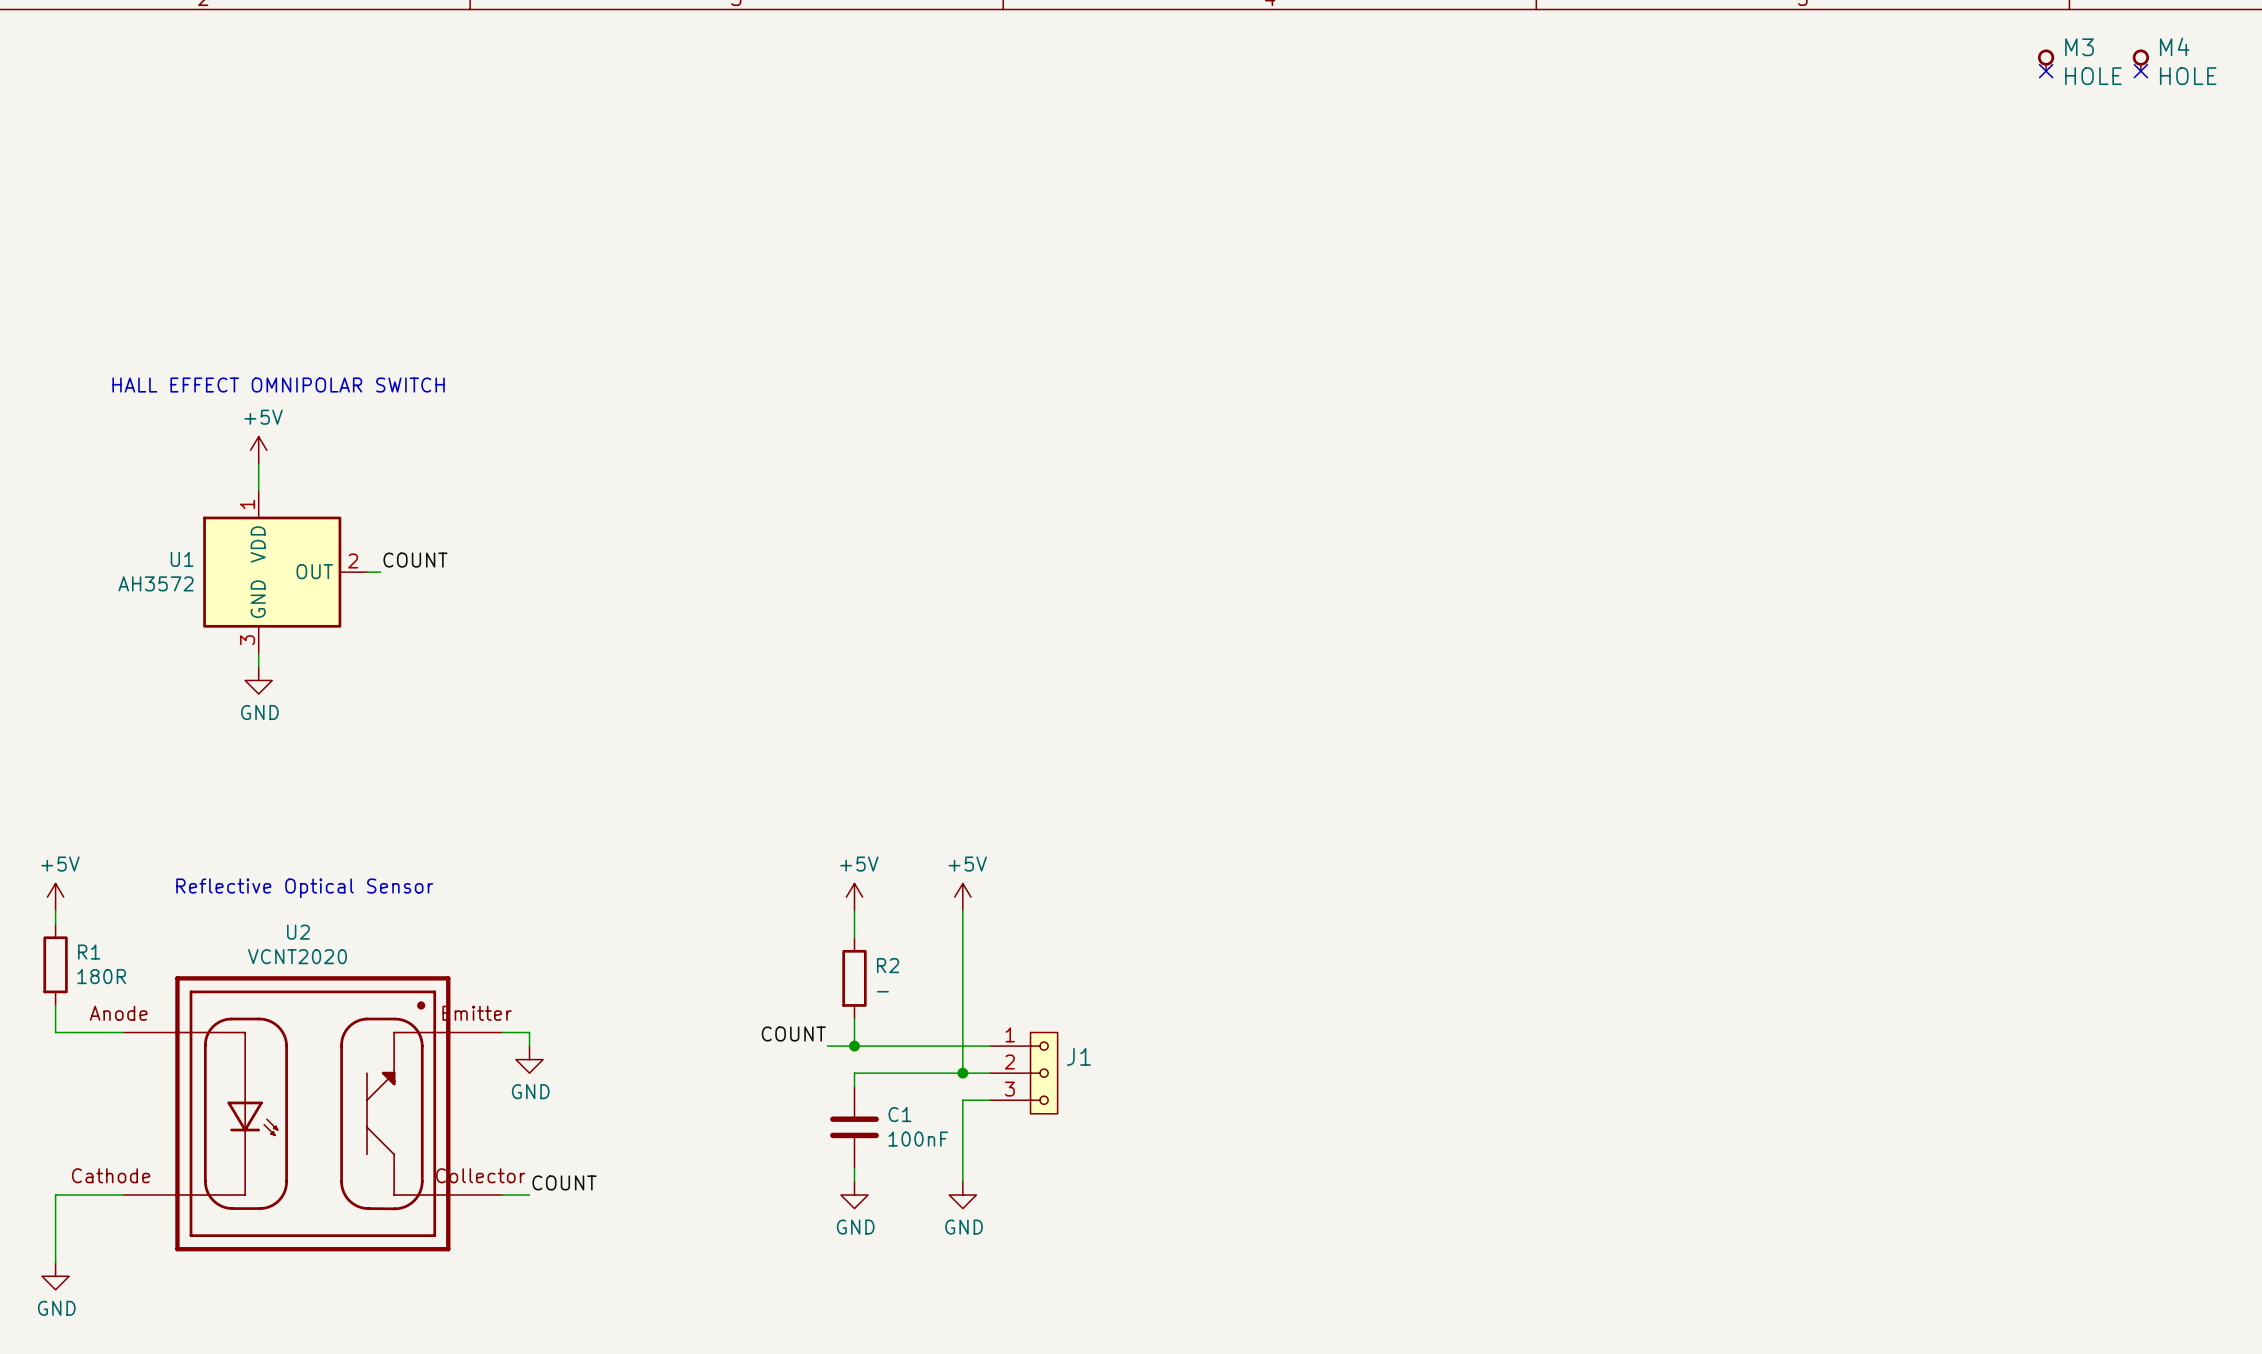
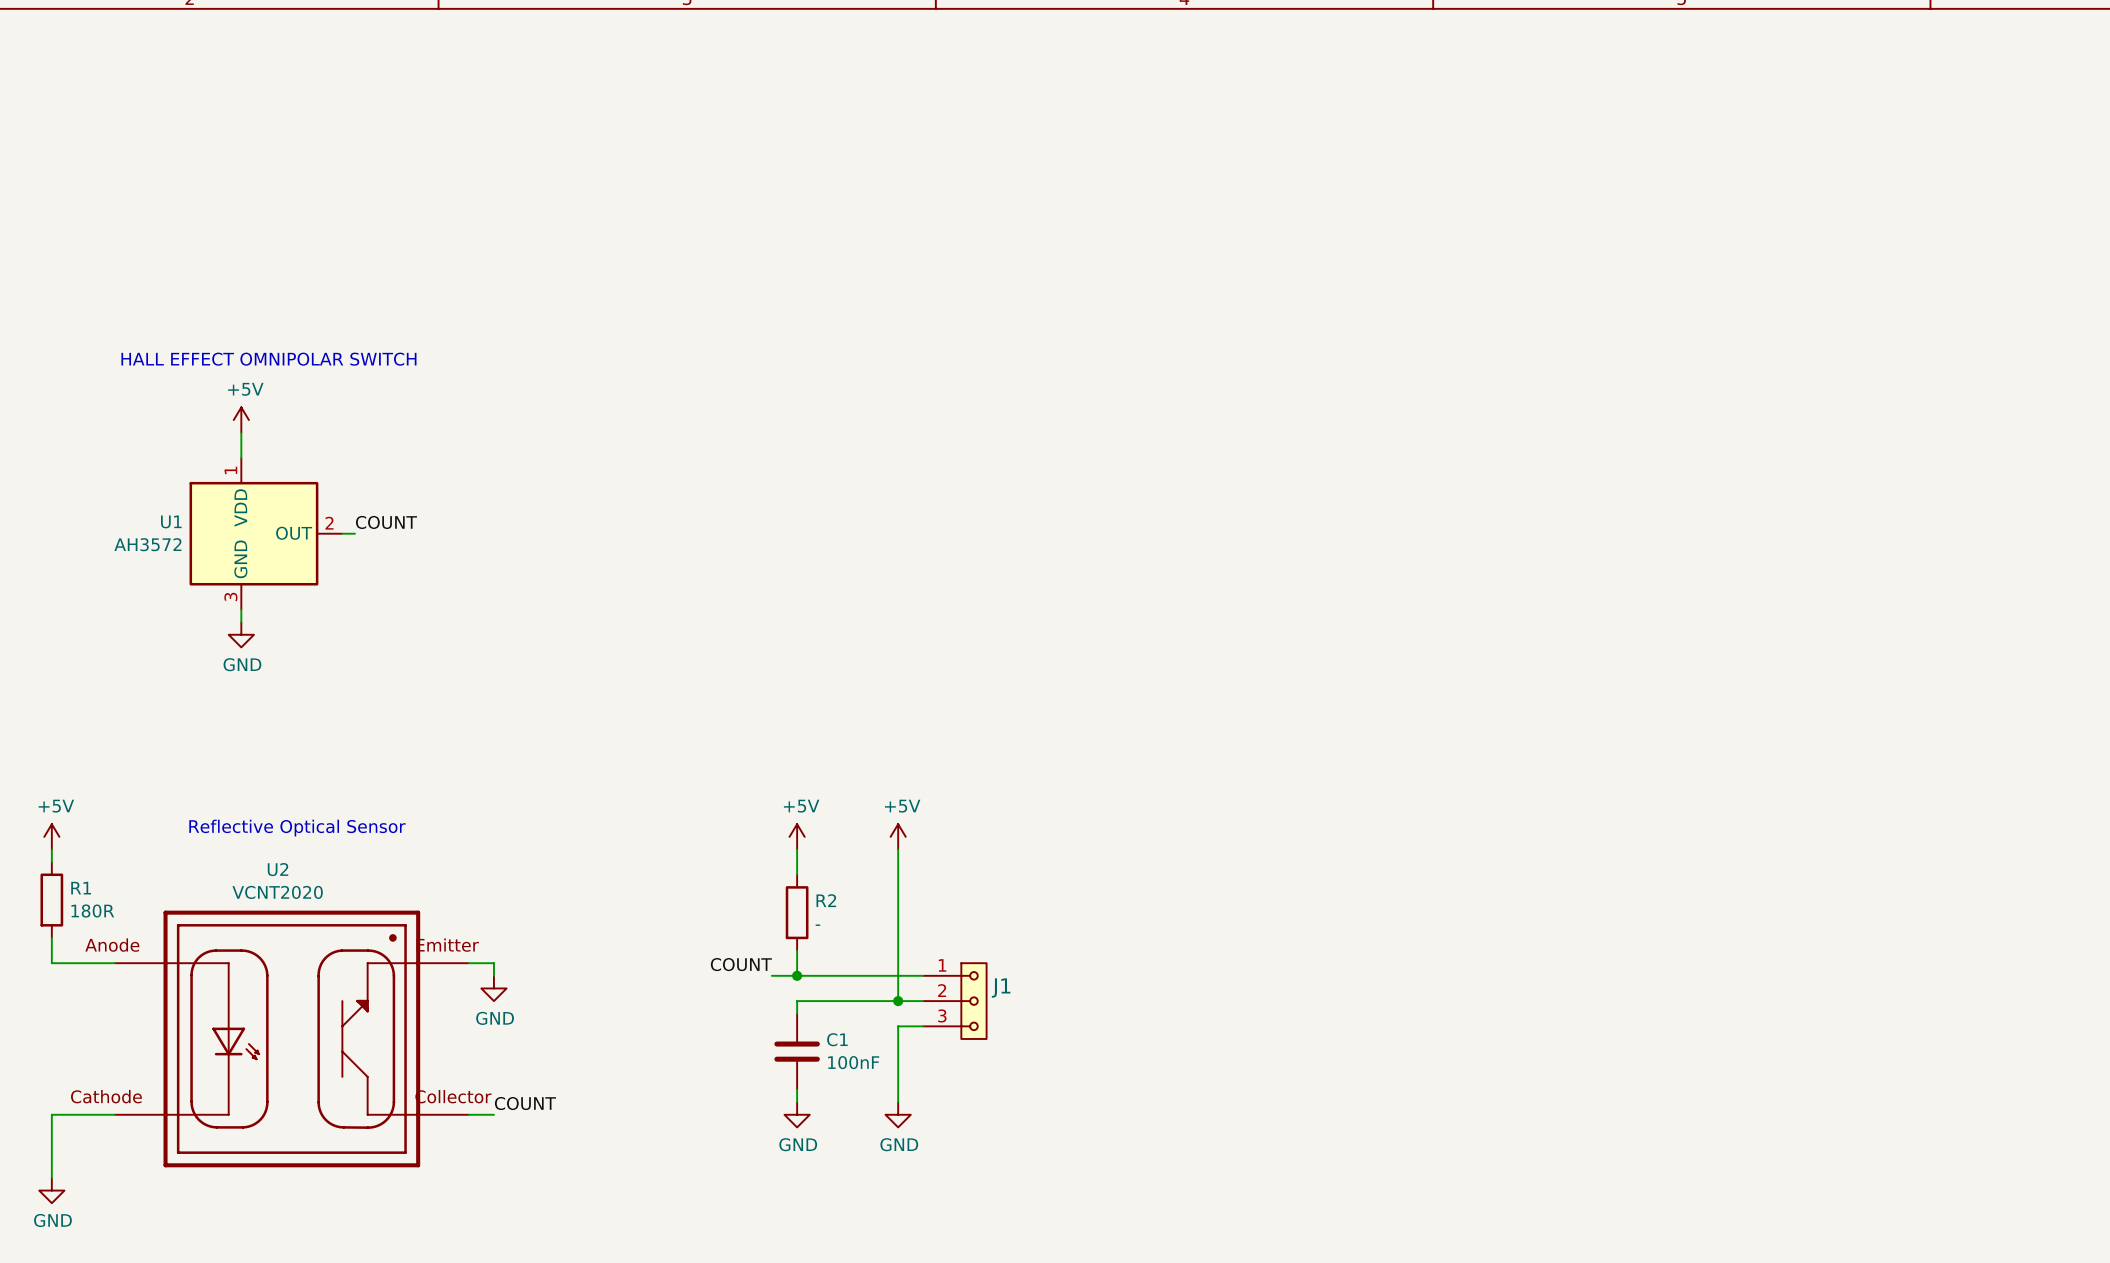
M3: HOLE (2046, 60) -> none
M4: HOLE (2140, 60) -> none
no-connect mark: (2046, 71) -> none
no-connect mark: (2140, 71) -> none

